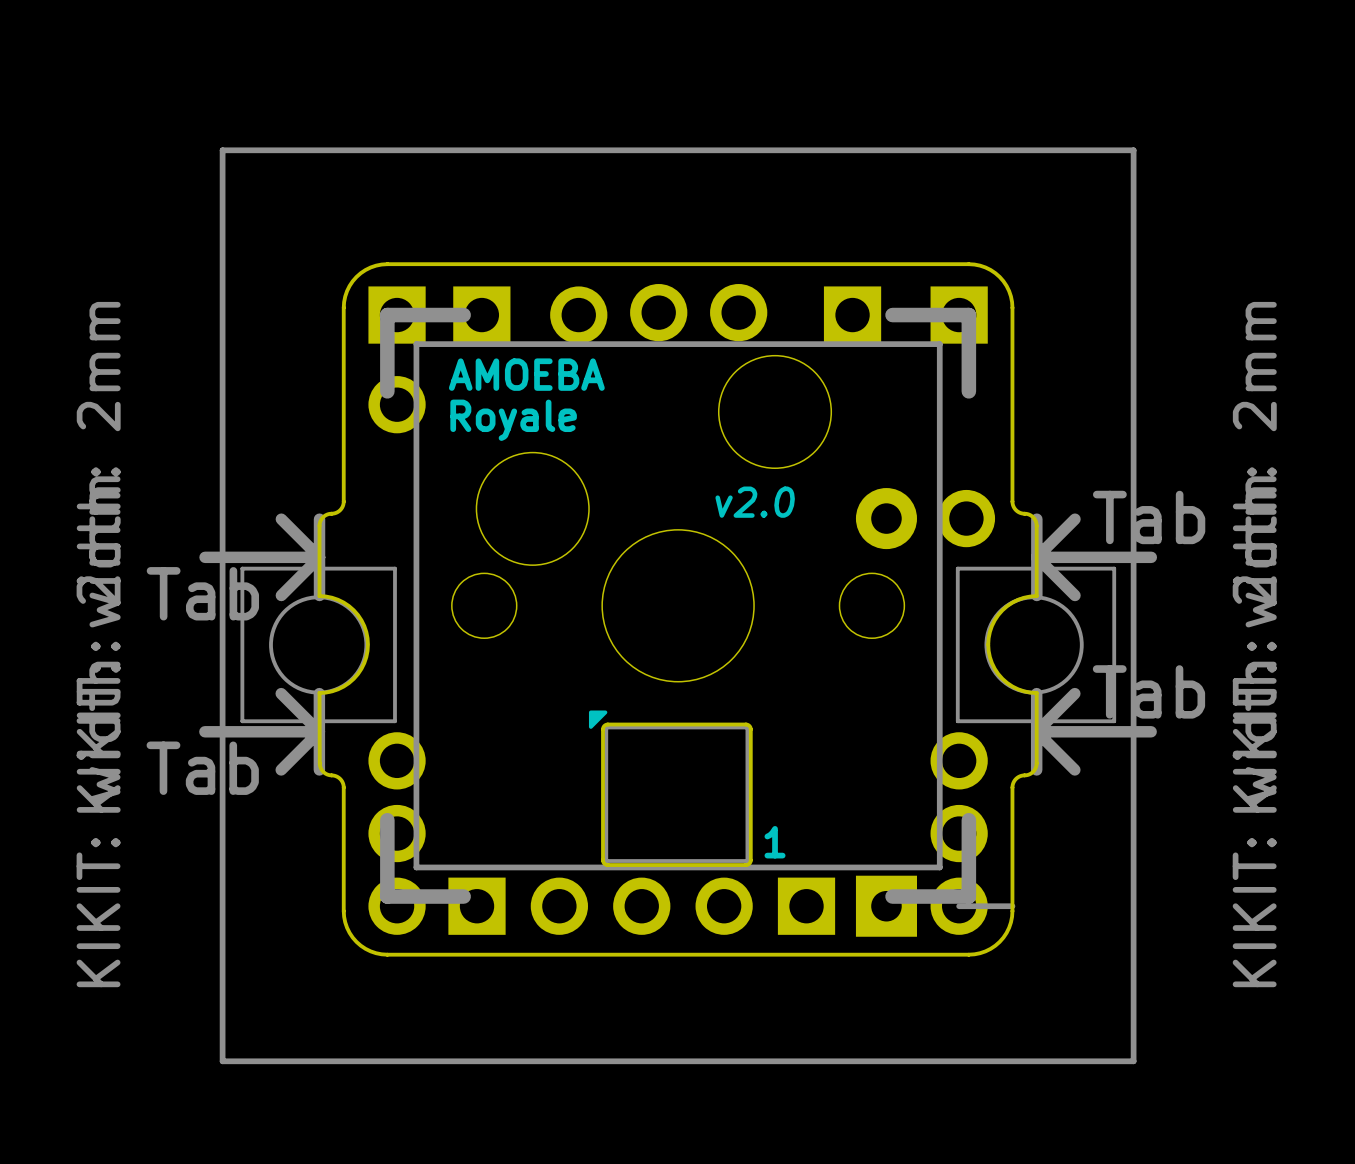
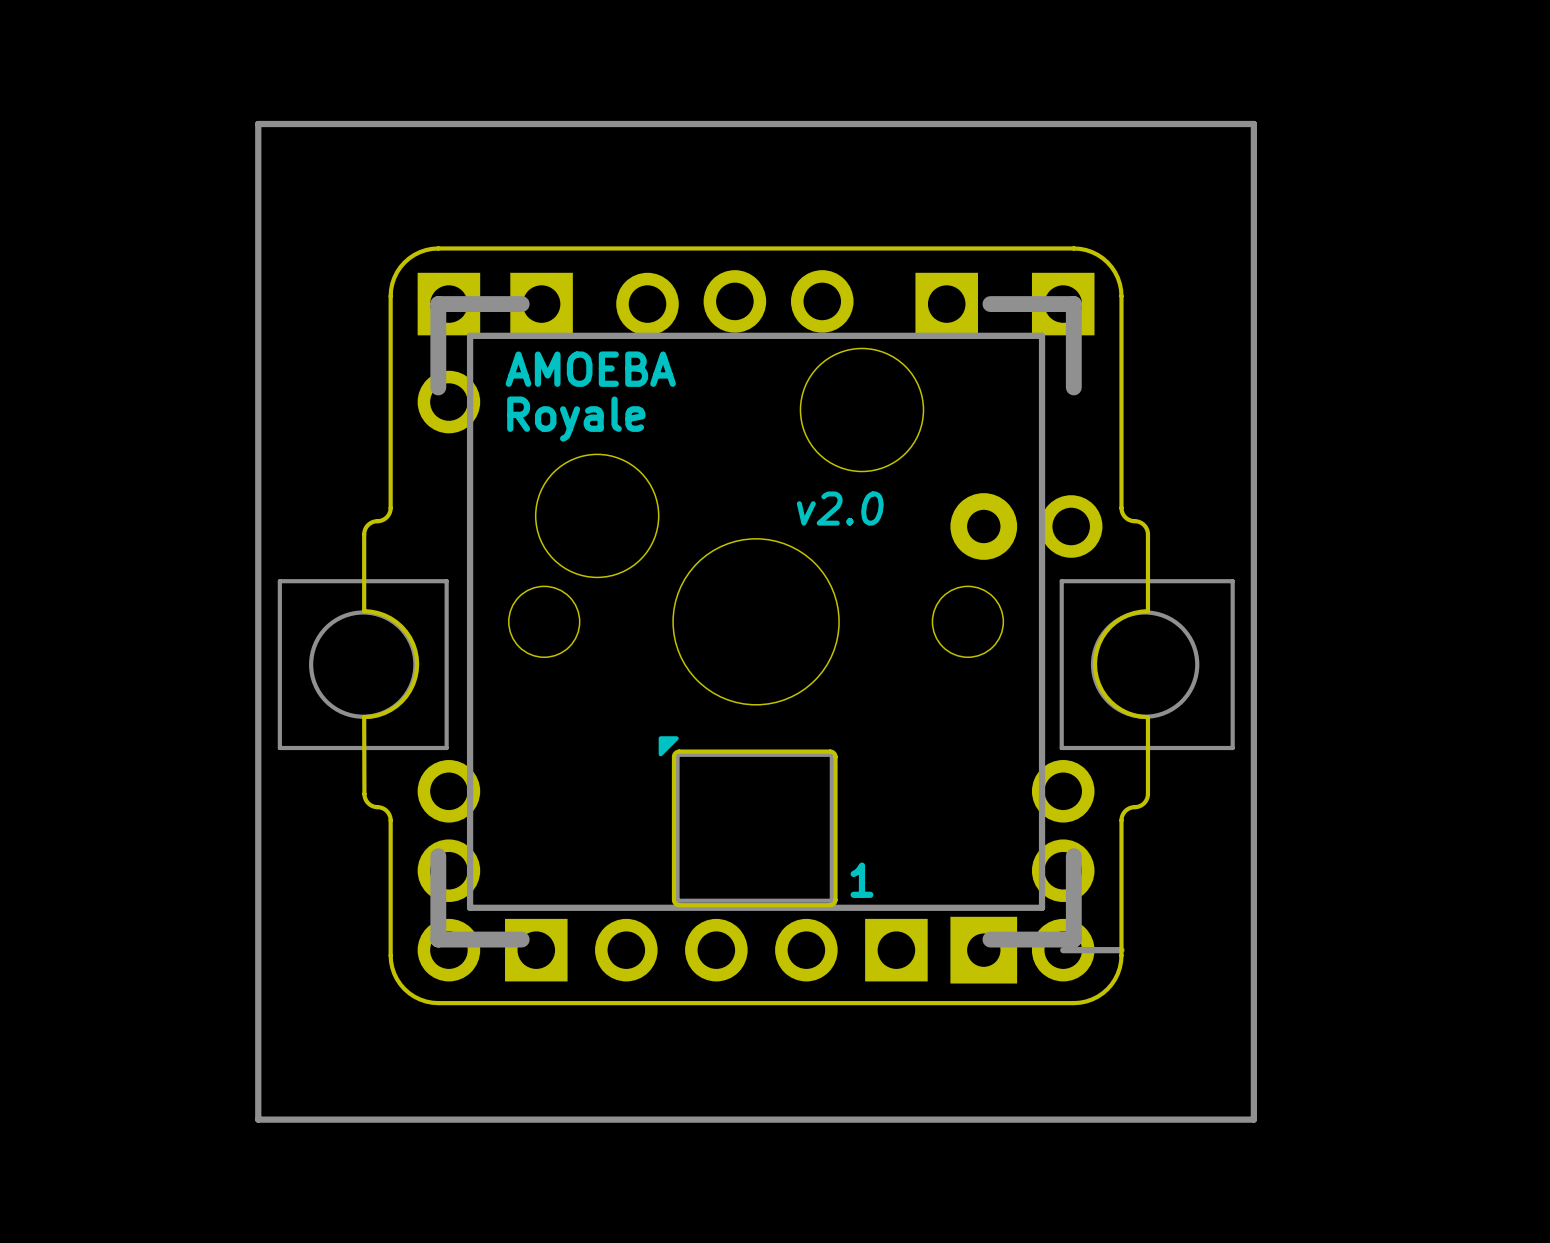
drawing: [199, 513, 326, 776] -> none
drawing: [1030, 513, 1158, 776] -> none

